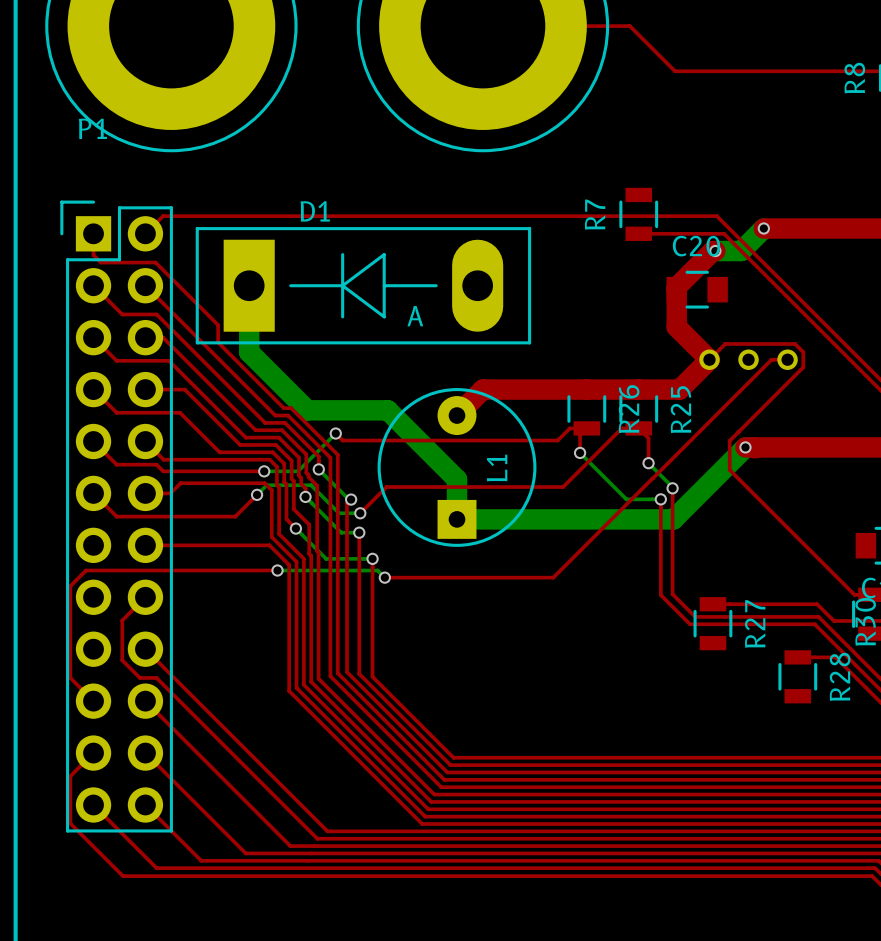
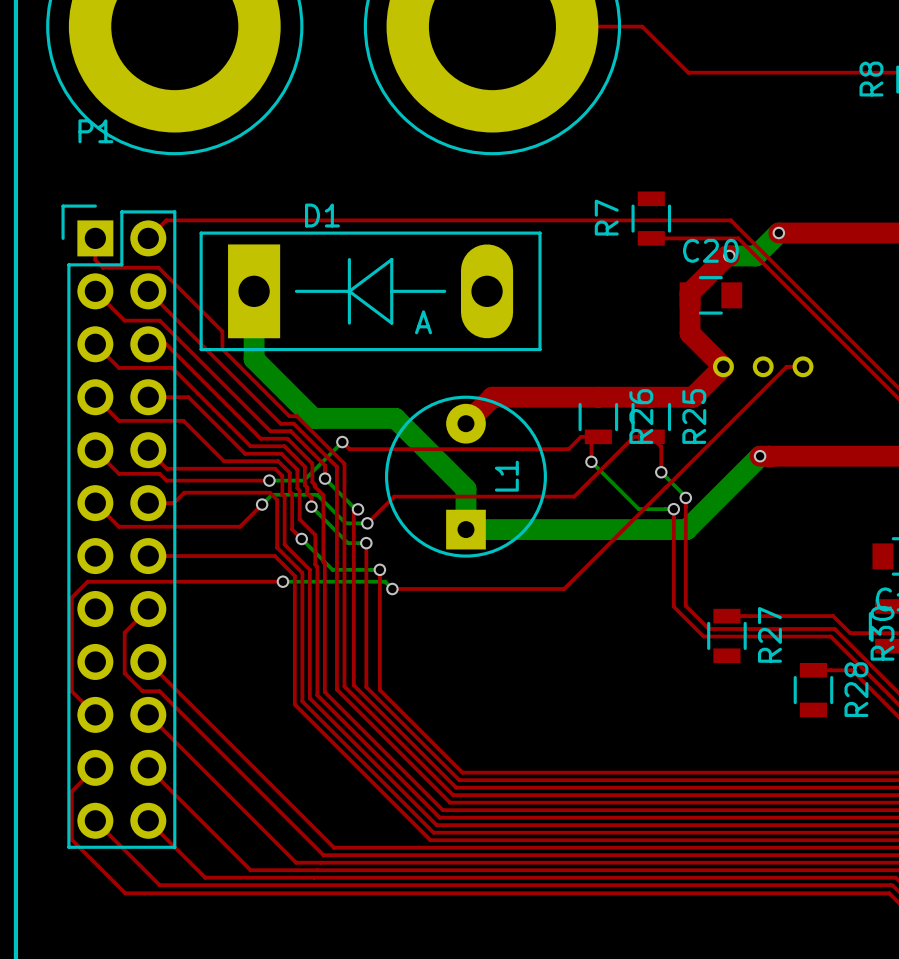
top track: (709, 359) (725, 343) (795, 343) (803, 352) (803, 367) (729, 440) (729, 469) (854, 594) (871, 594) -> none

